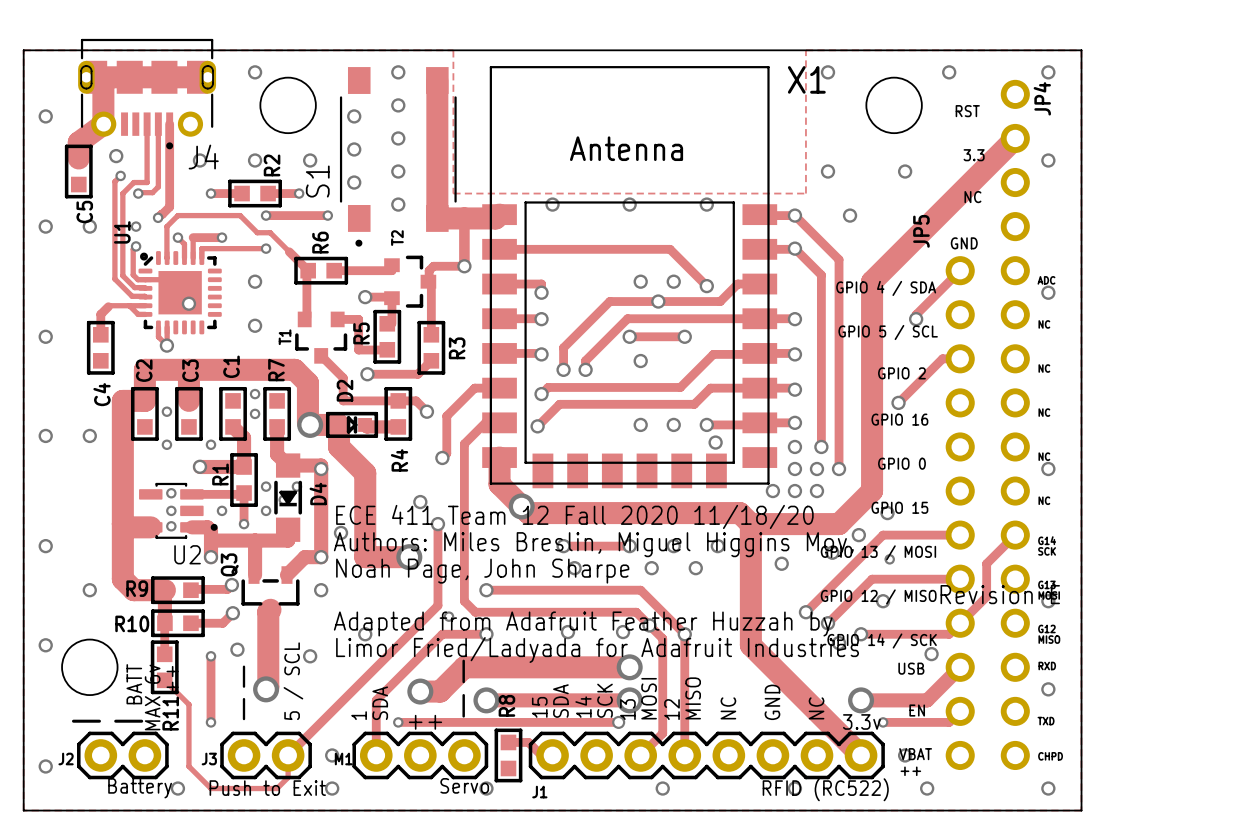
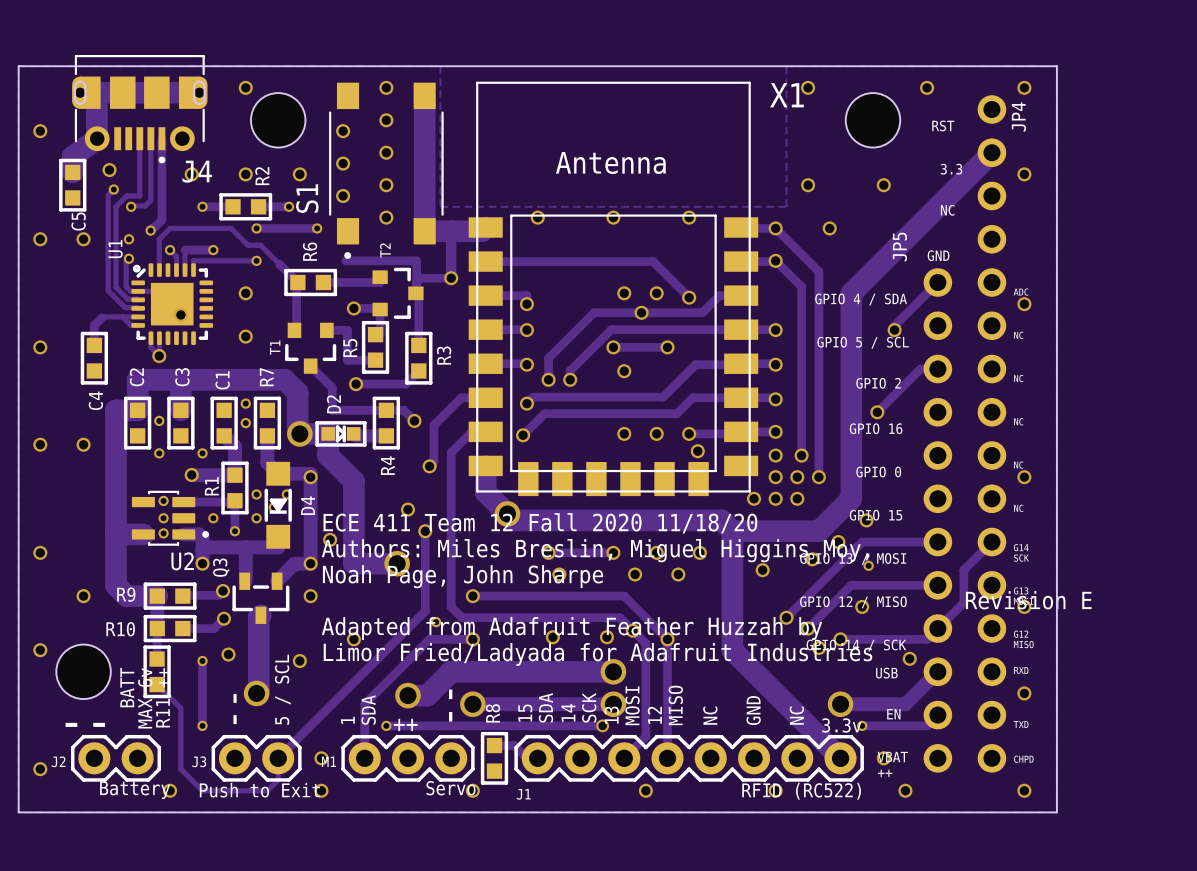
track: none -> (345, 260) (416, 260) (416, 282)

